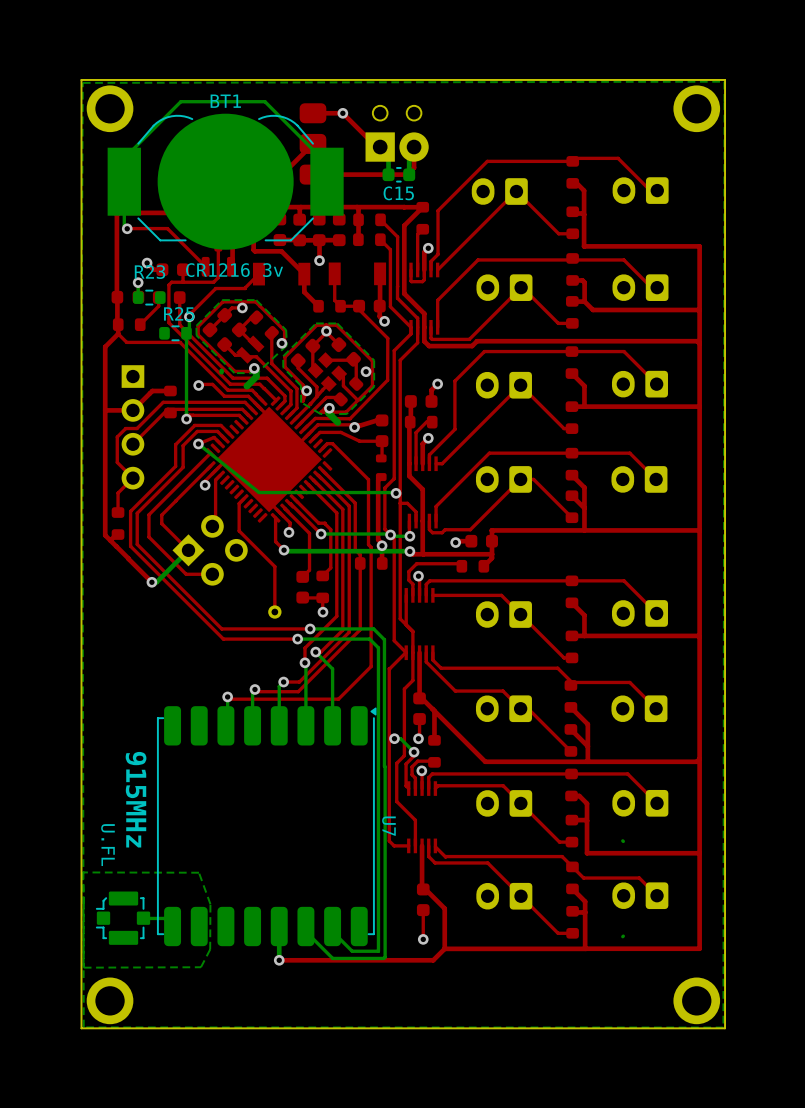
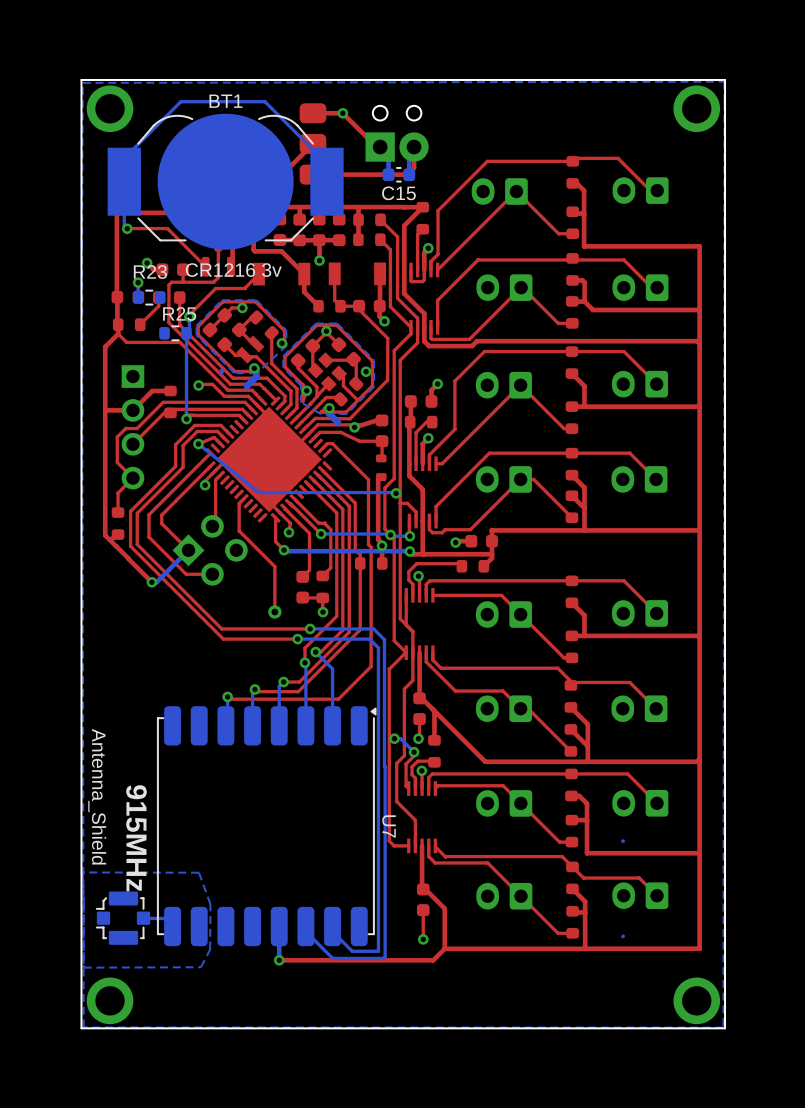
text position: 915MHz (136, 799) -> 915MHz (136, 838)
part value: U.FL (108, 845) -> Antenna_Shield (97, 796)

